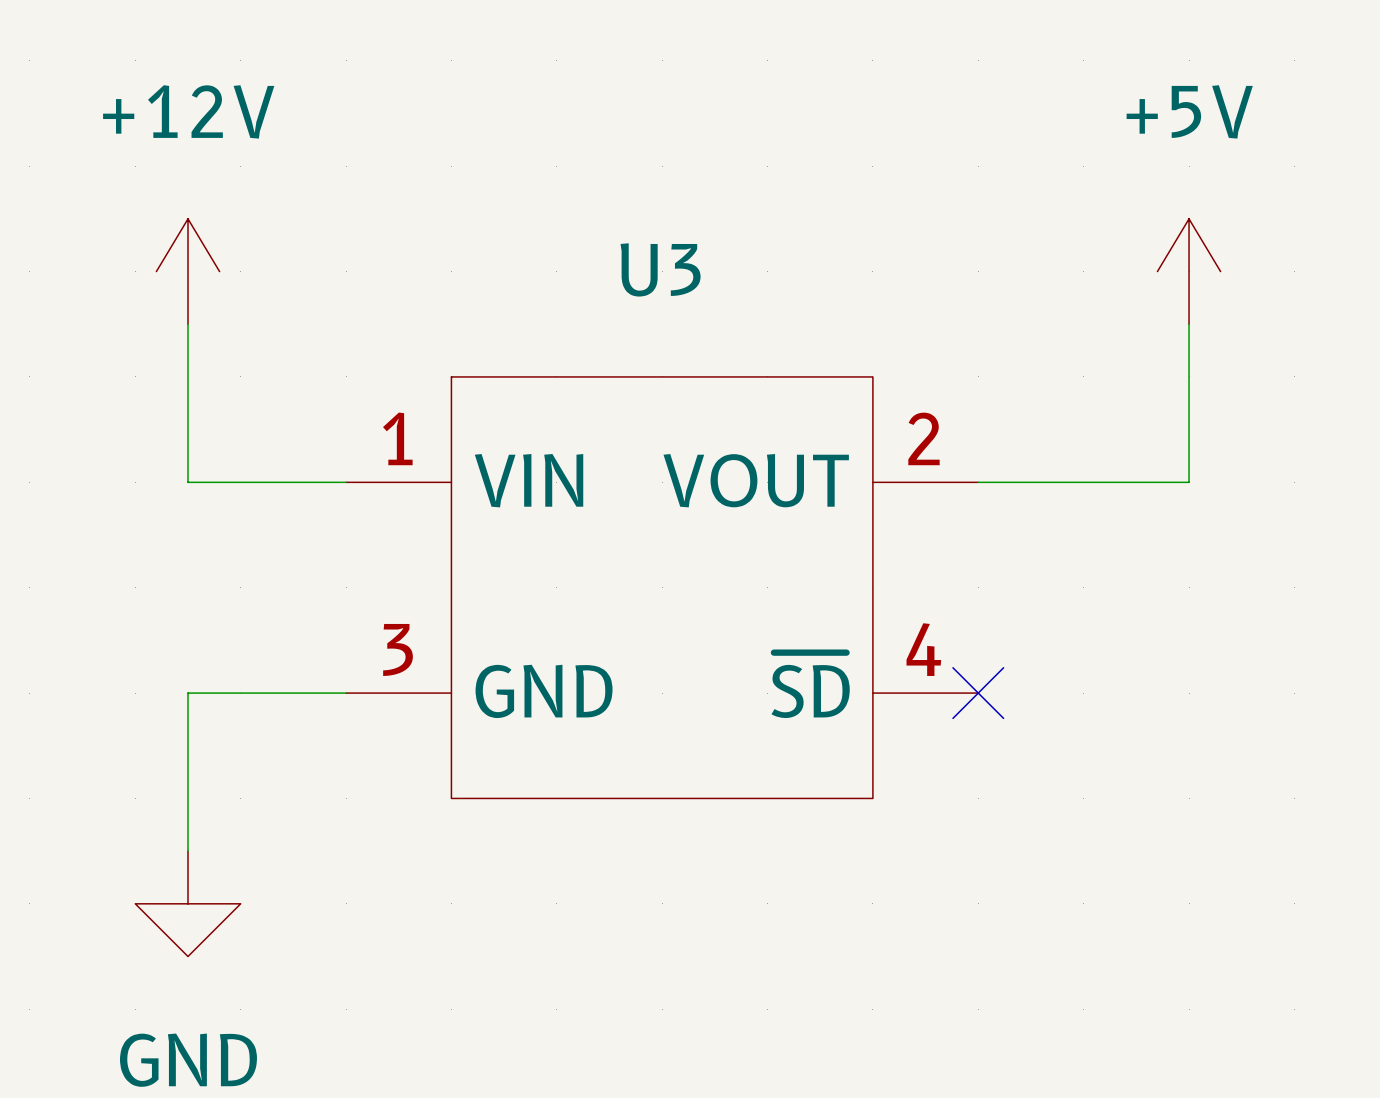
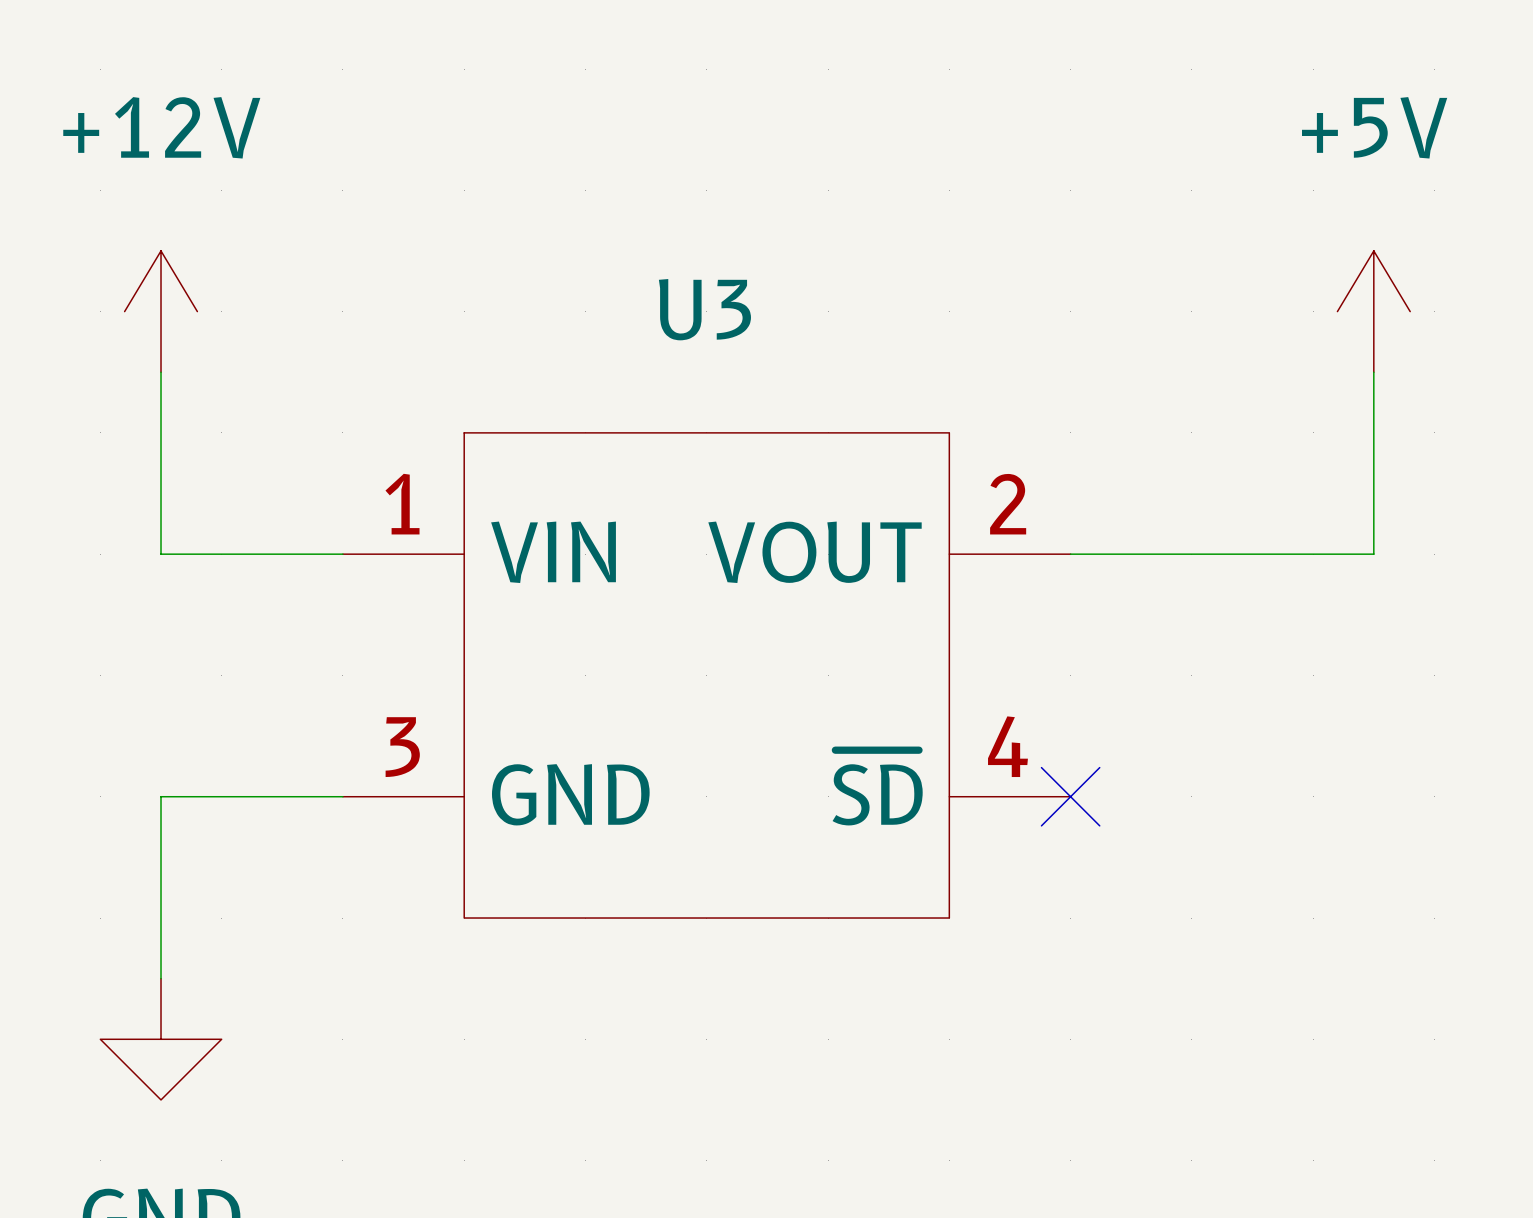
power symbol position: +5V (1189, 271) -> +5V (1373, 311)
wire: (1189, 324) (1189, 482) -> (1373, 372) (1373, 554) (1313, 554)

